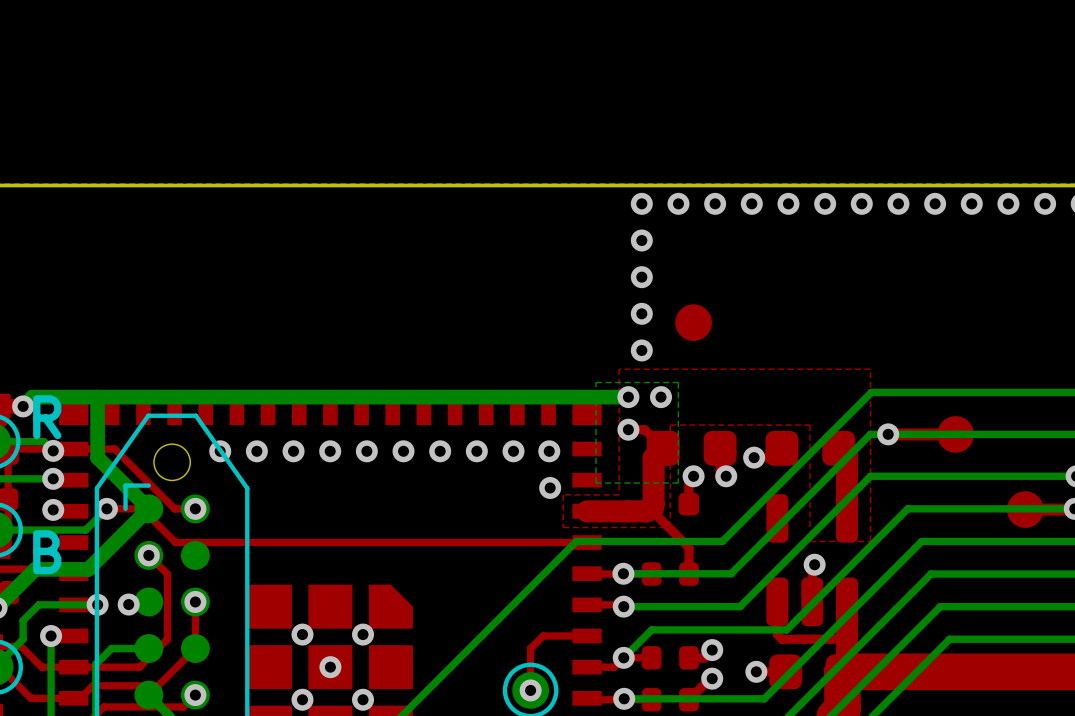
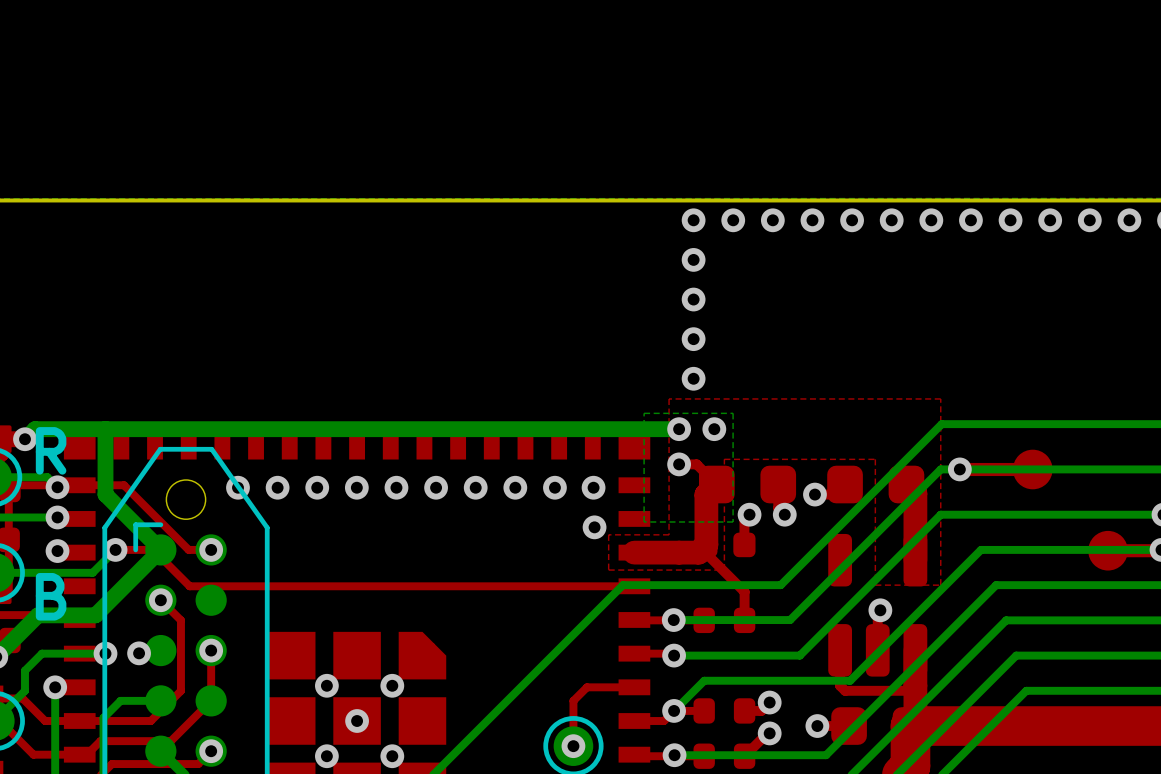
part: (693, 322) -> none

